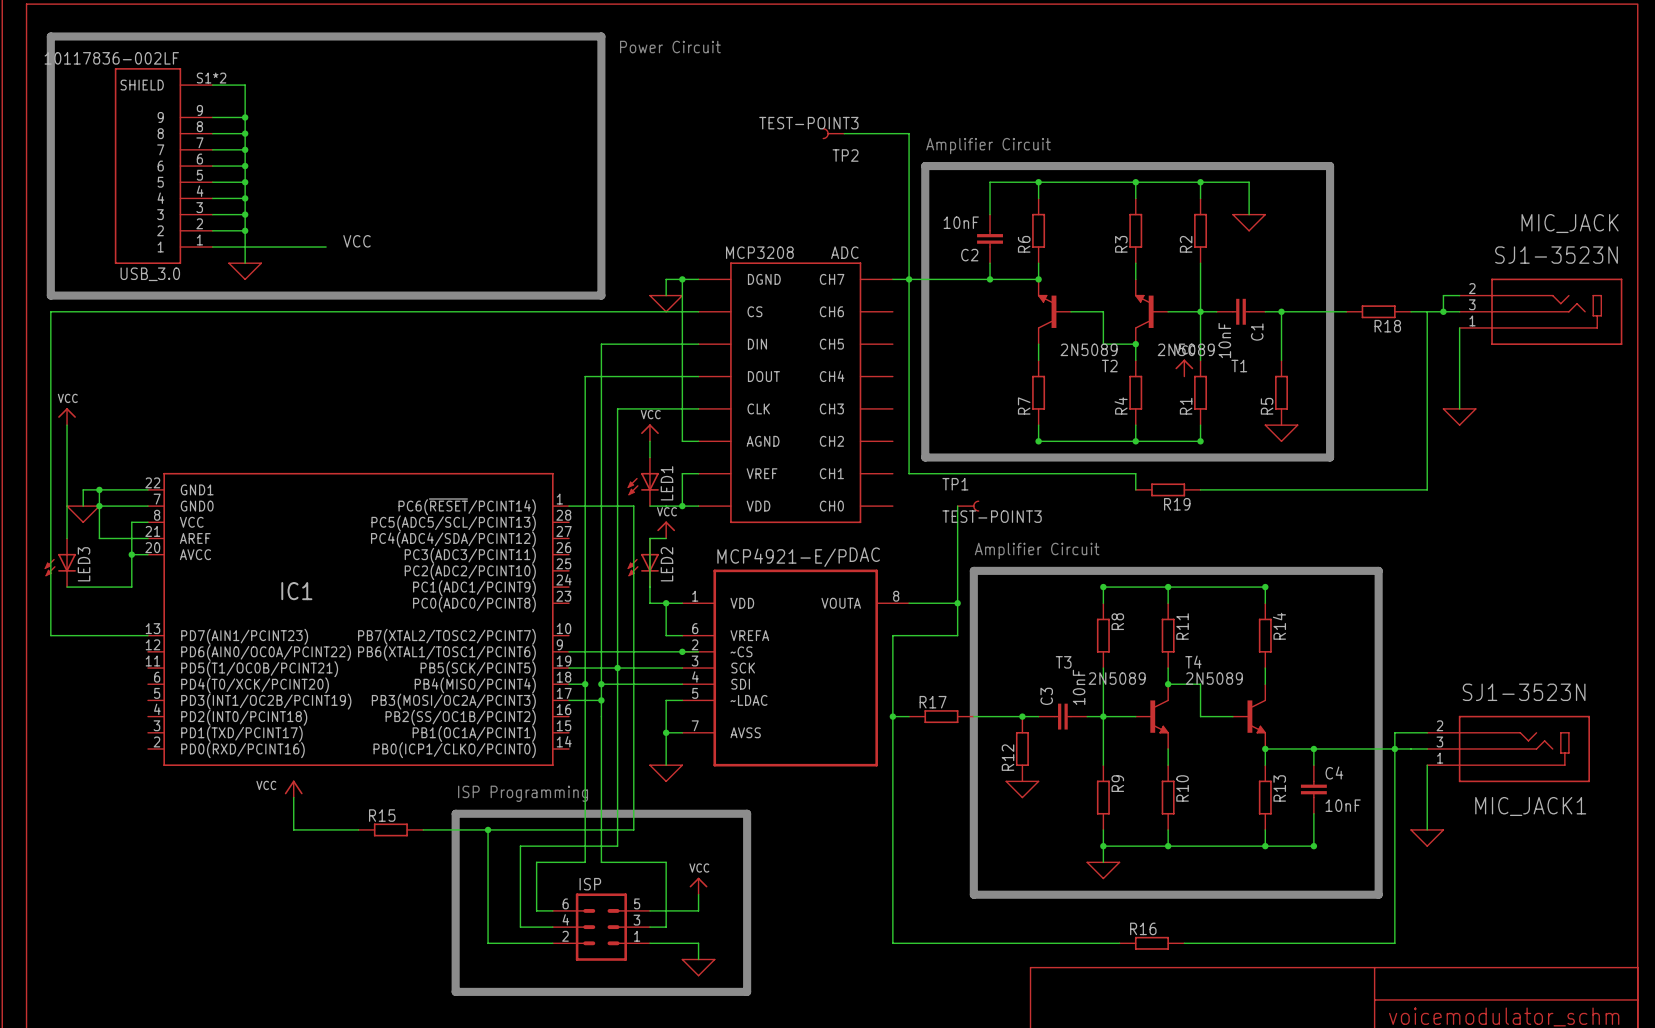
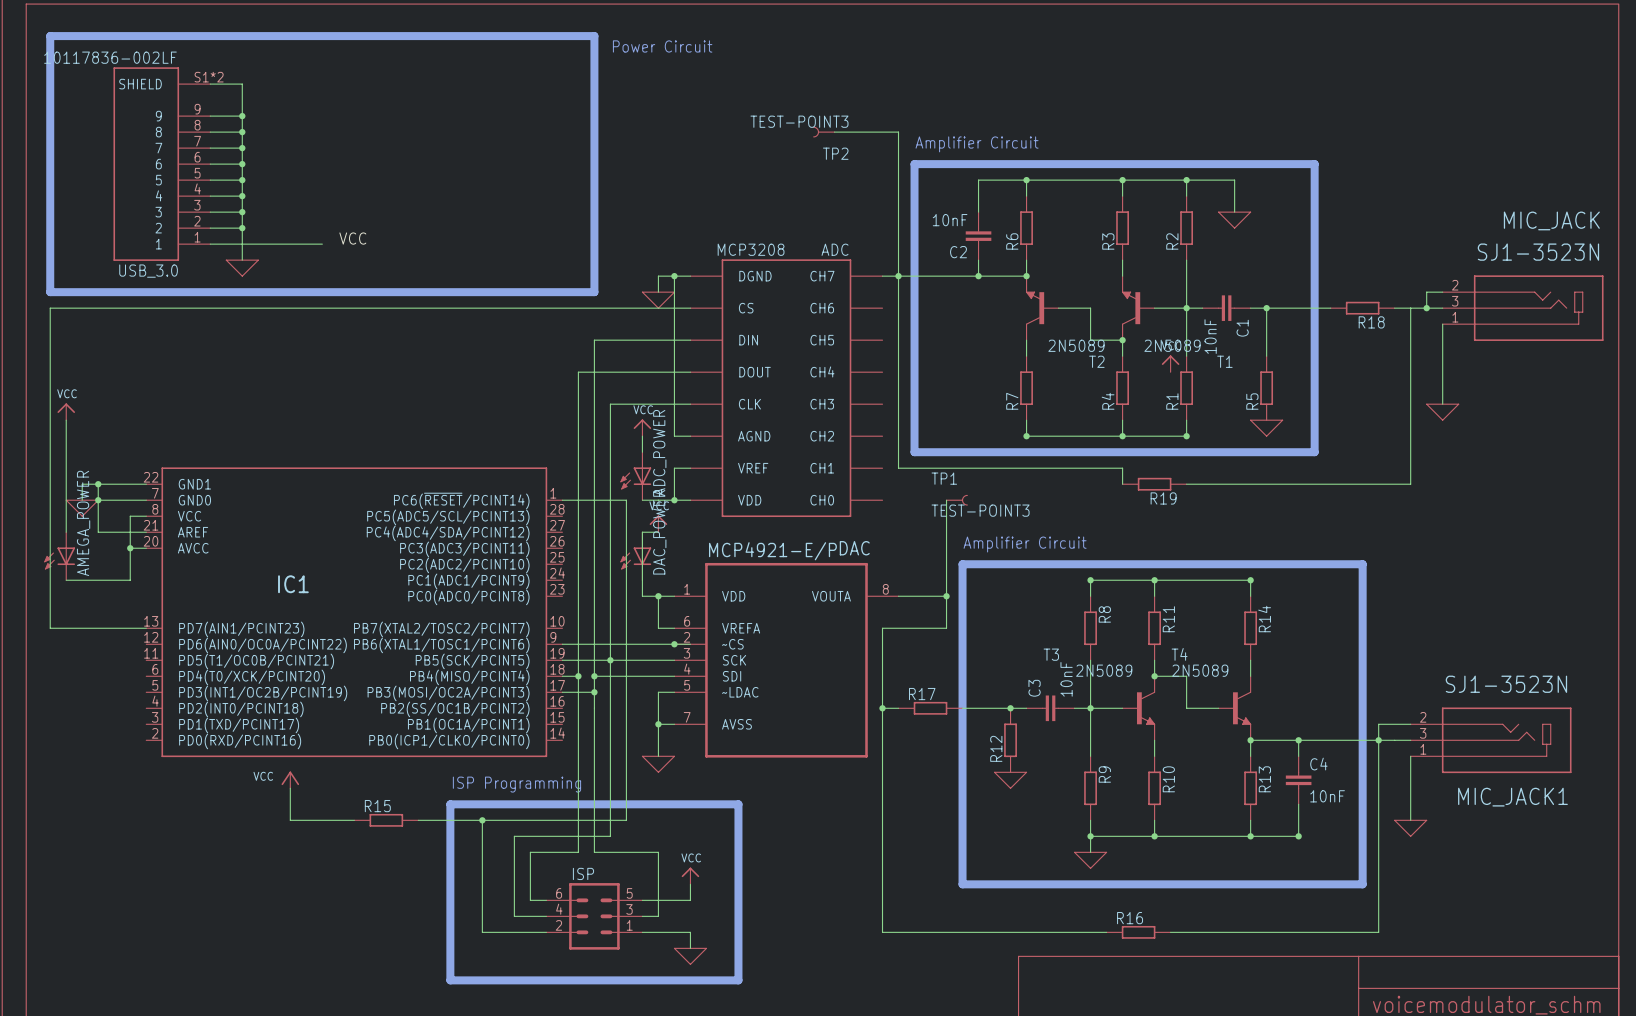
LED1 name: LED1 (666, 483) -> ADC_POWER (659, 452)
LED3 name: LED3 (84, 564) -> AMEGA_POWER (83, 523)
LED2 name: LED2 (666, 564) -> DAC_POWER (659, 532)

